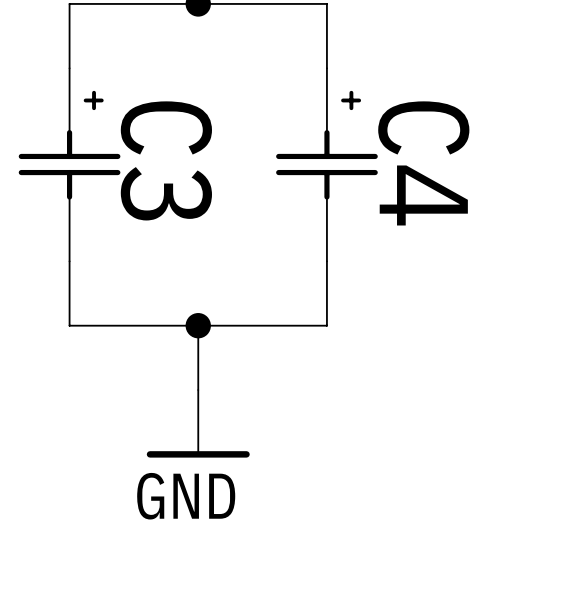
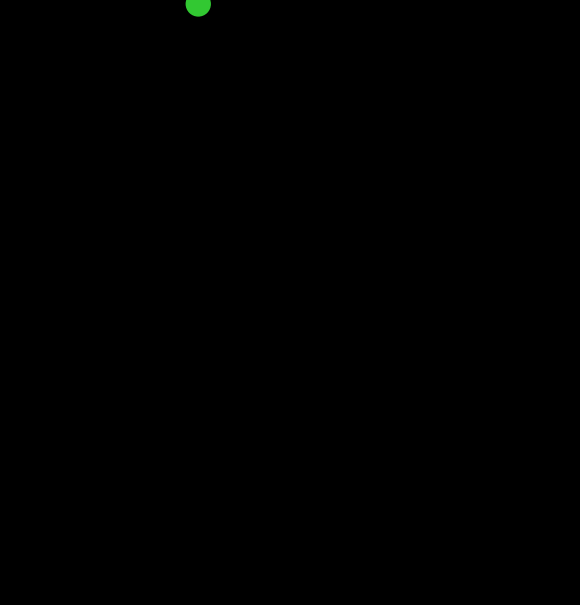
wire: (69, 68) (69, 3) (326, 3) (326, 68) -> none
C3: (69, 164) -> none
C4: (326, 164) -> none
wire: (69, 261) (69, 325) (326, 325) (326, 261) -> none
wire: (198, 325) (198, 390) -> none
junction: (198, 325) -> none
power symbol: GND (198, 423) -> none

